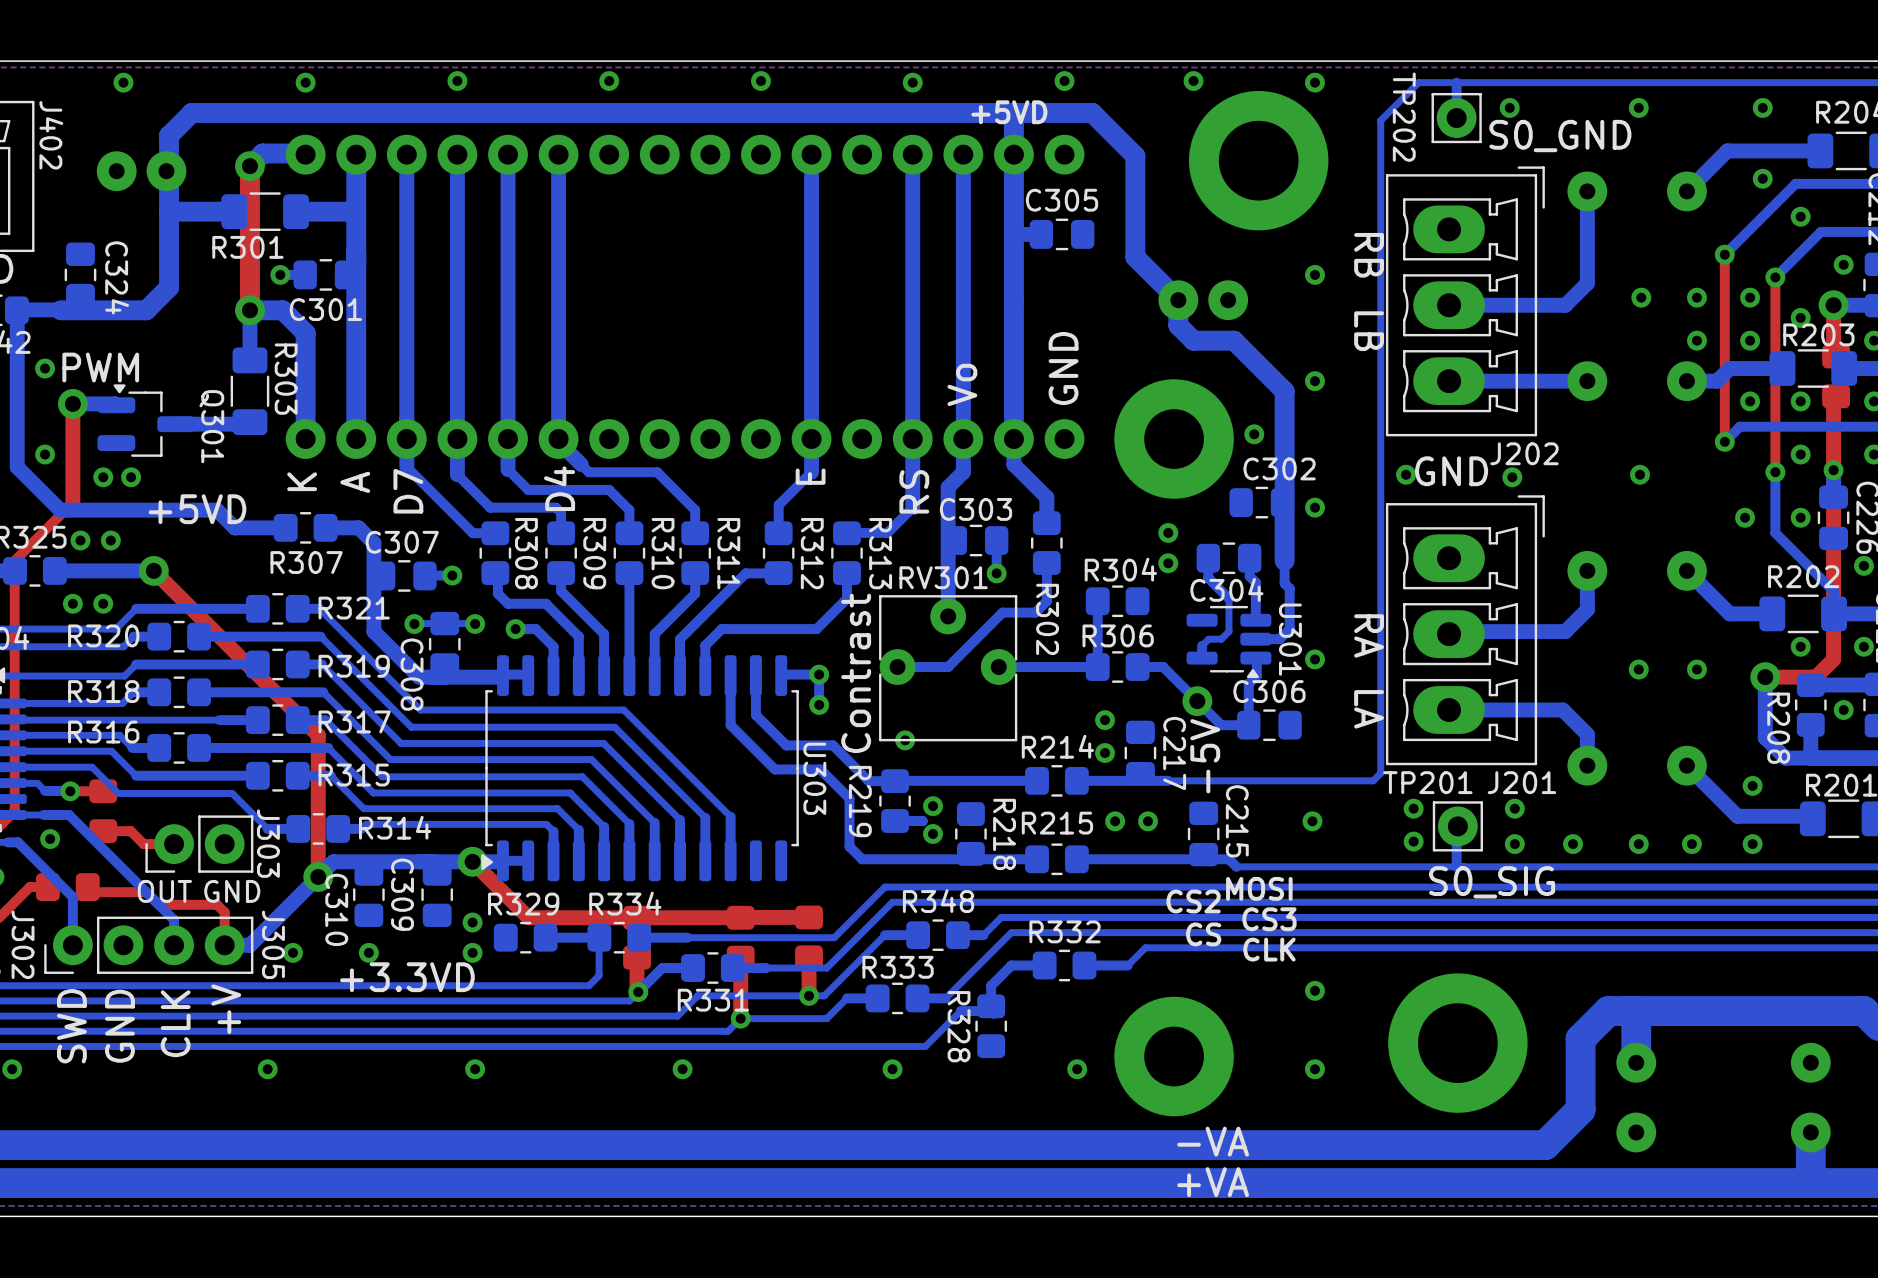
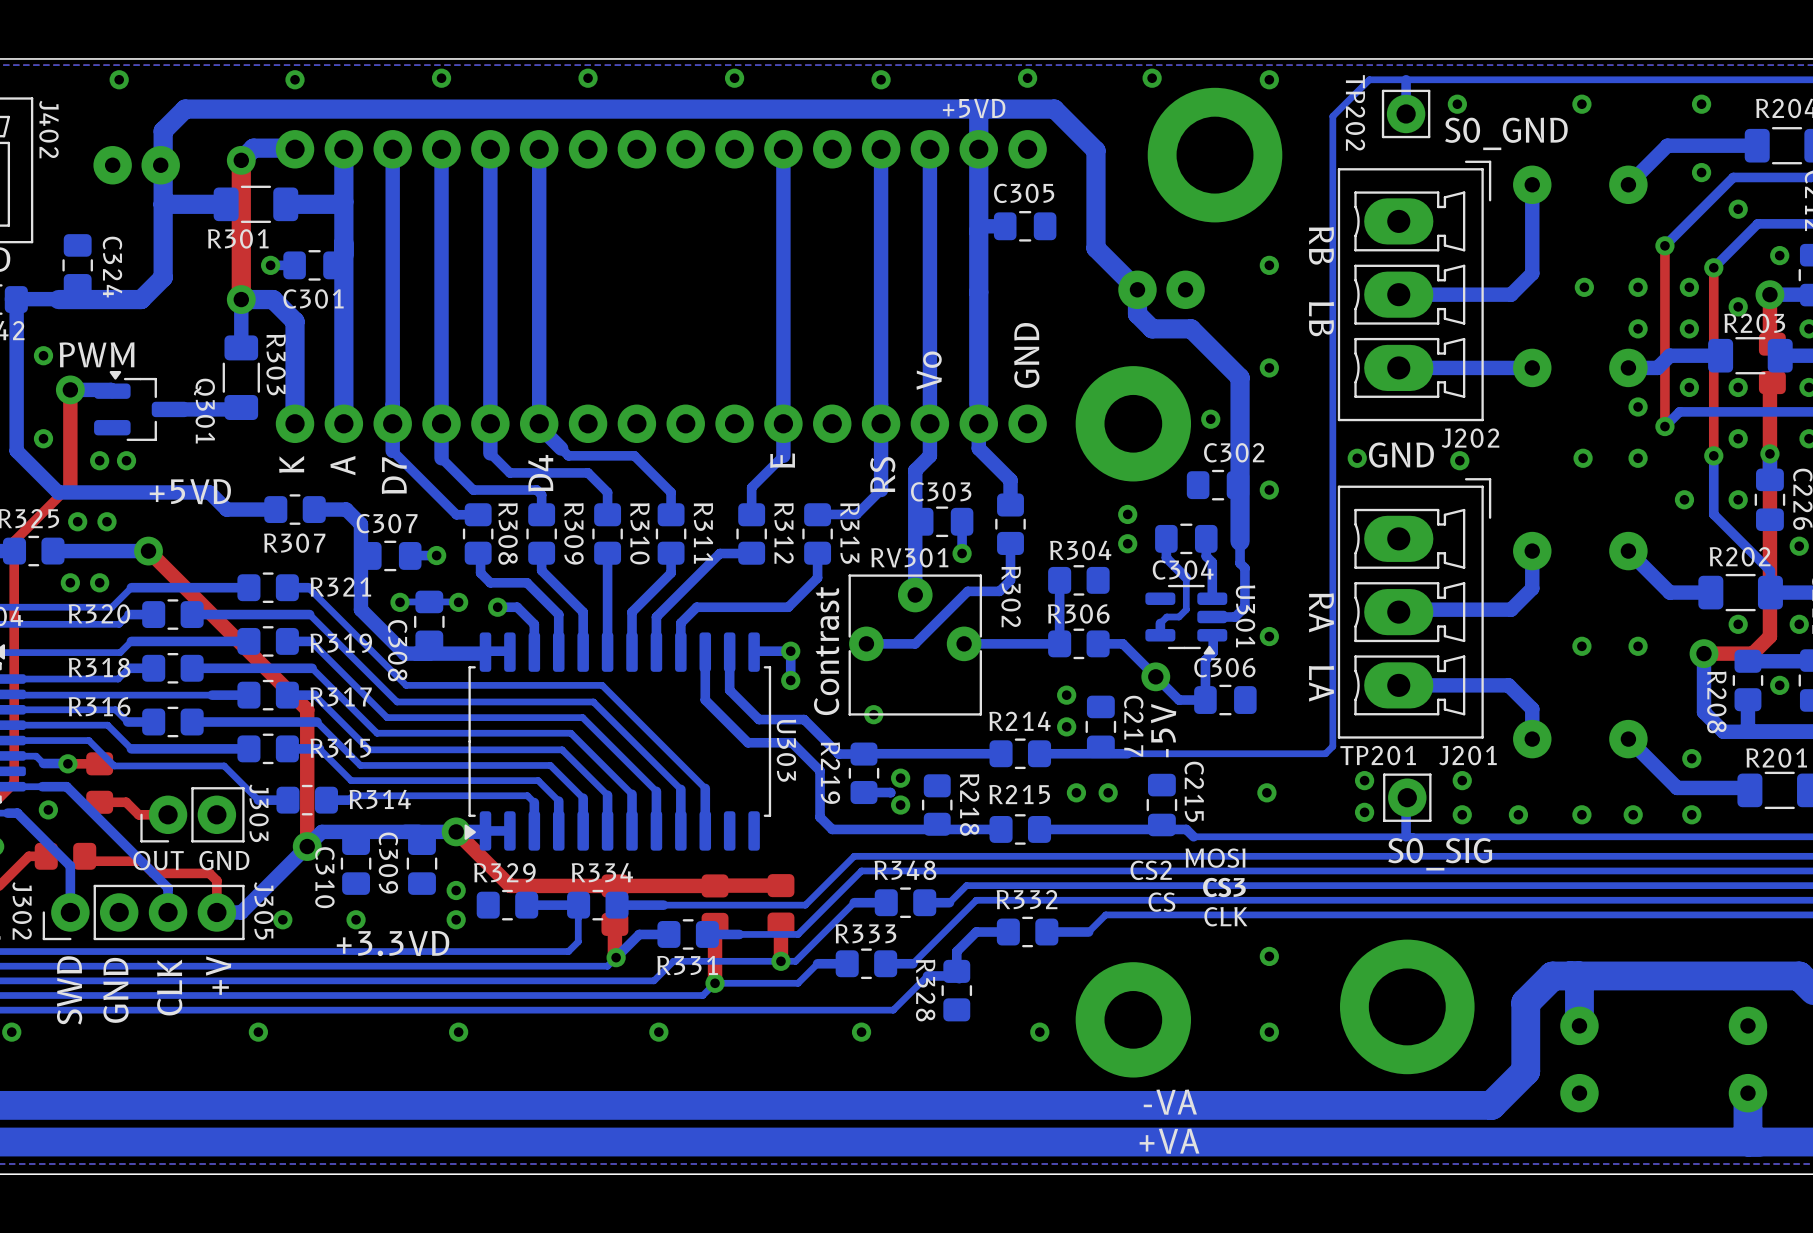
via: none -> (1638, 407)
via: none -> (1638, 458)

